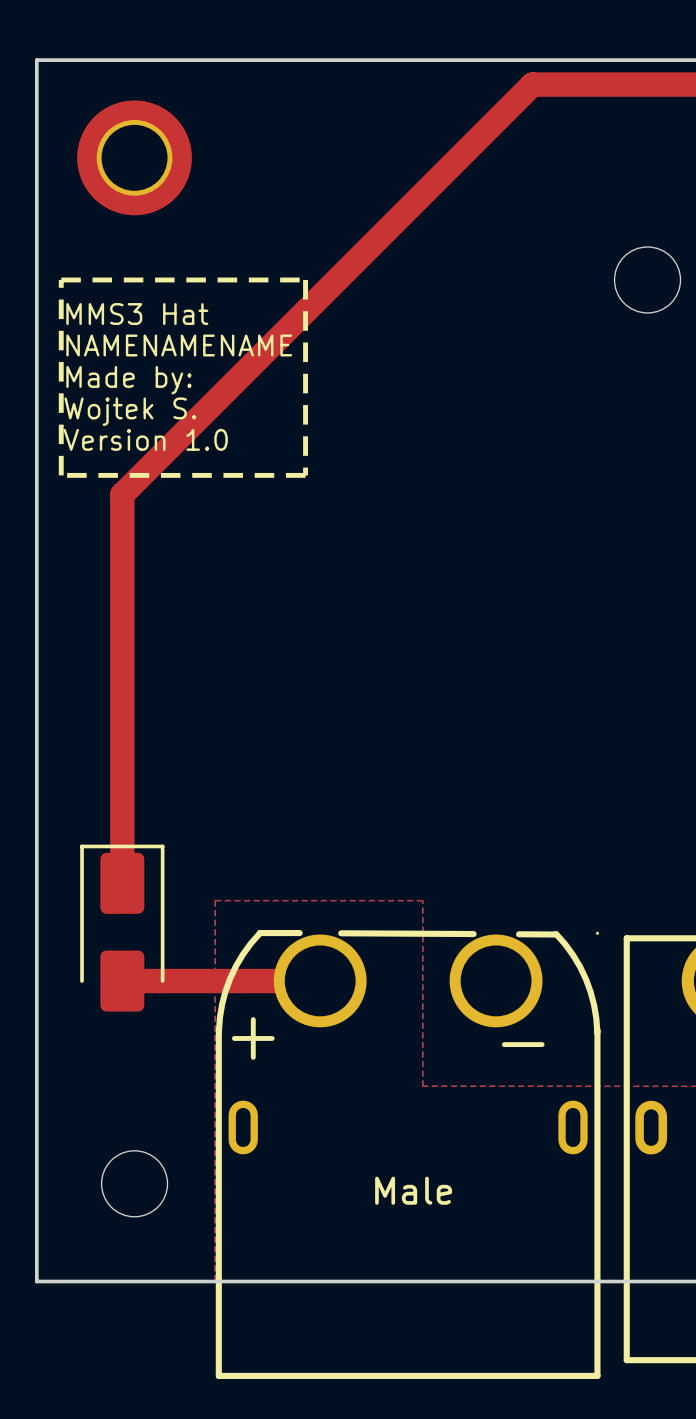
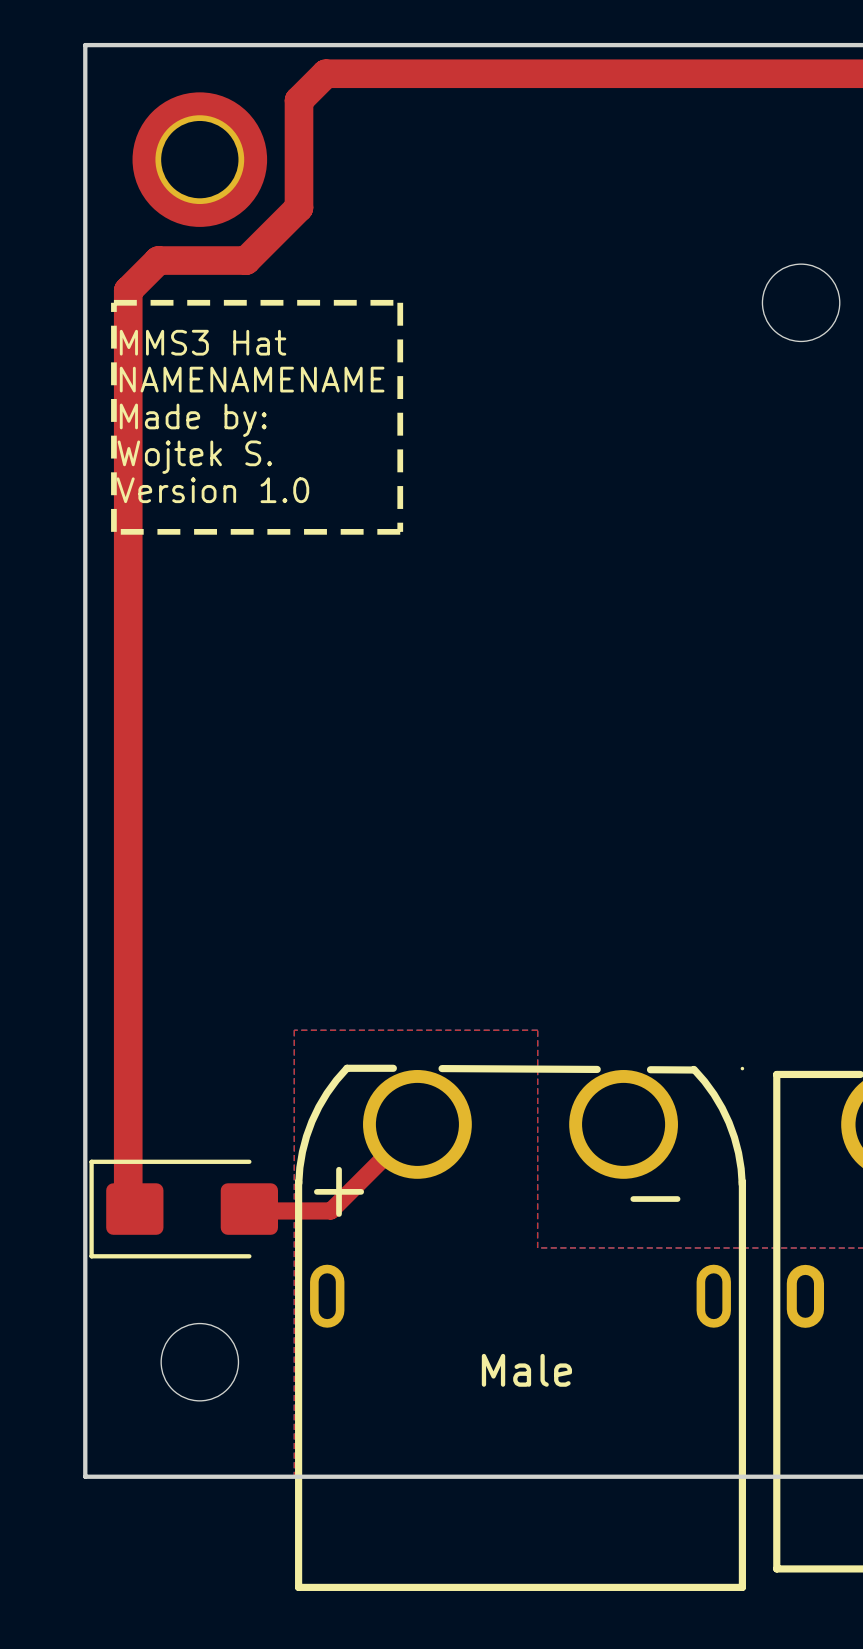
top track: (532, 84) (122, 494) (122, 883) -> (666, 73) (325, 73) (299, 100) (299, 207) (246, 260) (158, 260) (128, 290) (128, 1202) (136, 1210)
part: (122, 928) -> none
top track: (122, 981) (320, 981) -> (251, 1210) (330, 1210) (417, 1124)
part: none -> (183, 1209)

